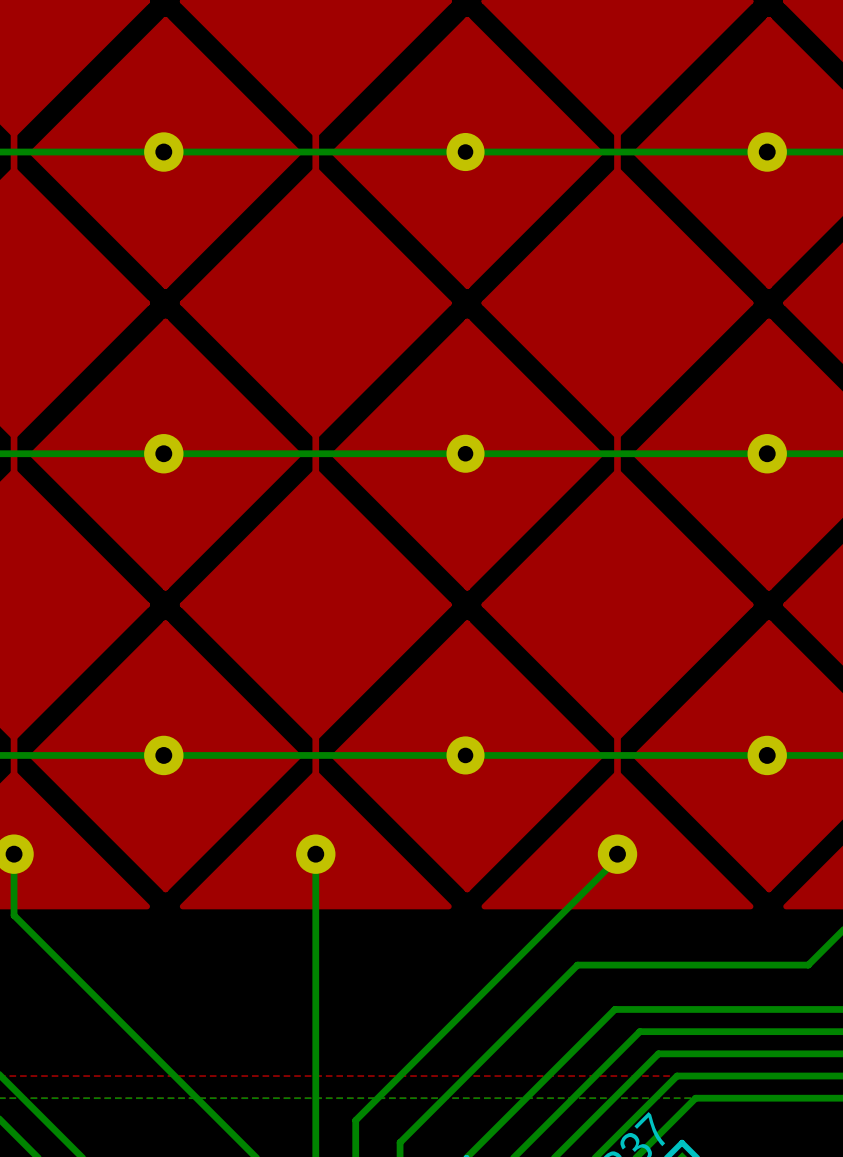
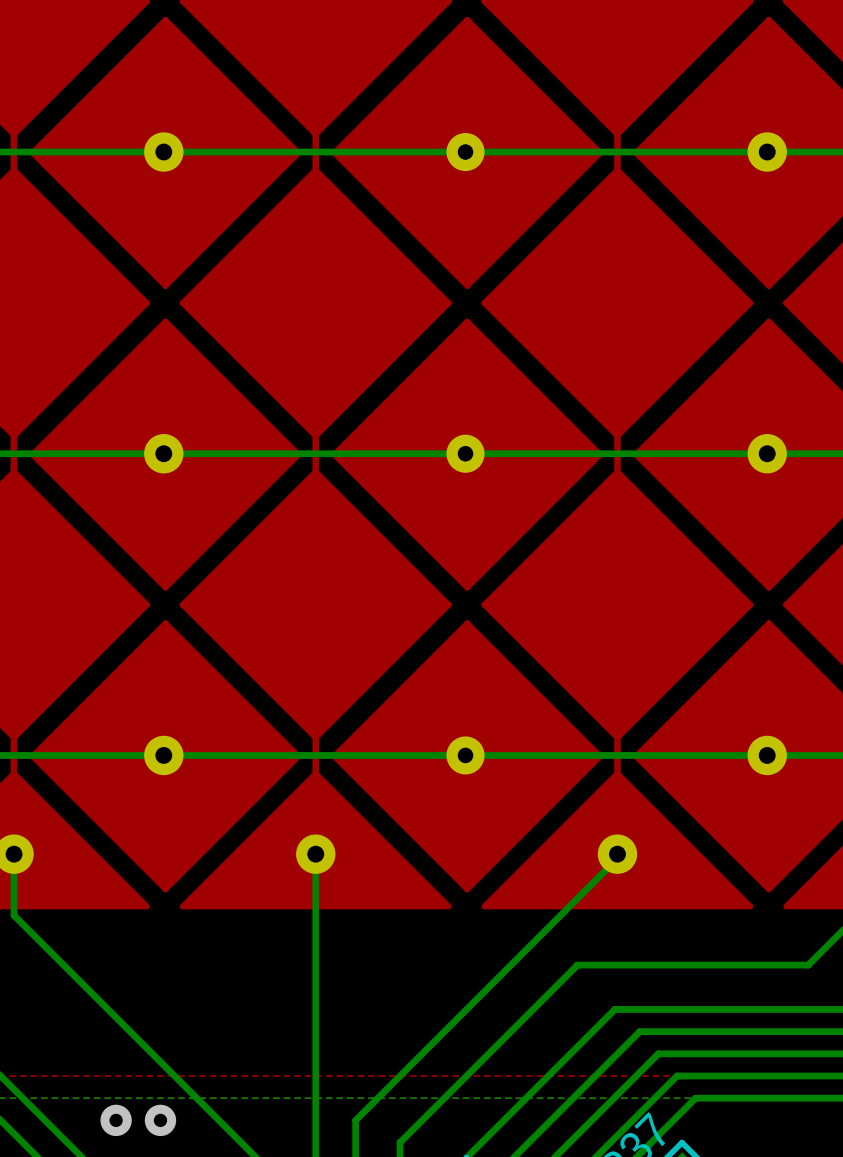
via: none -> (116, 1120)
via: none -> (160, 1120)

